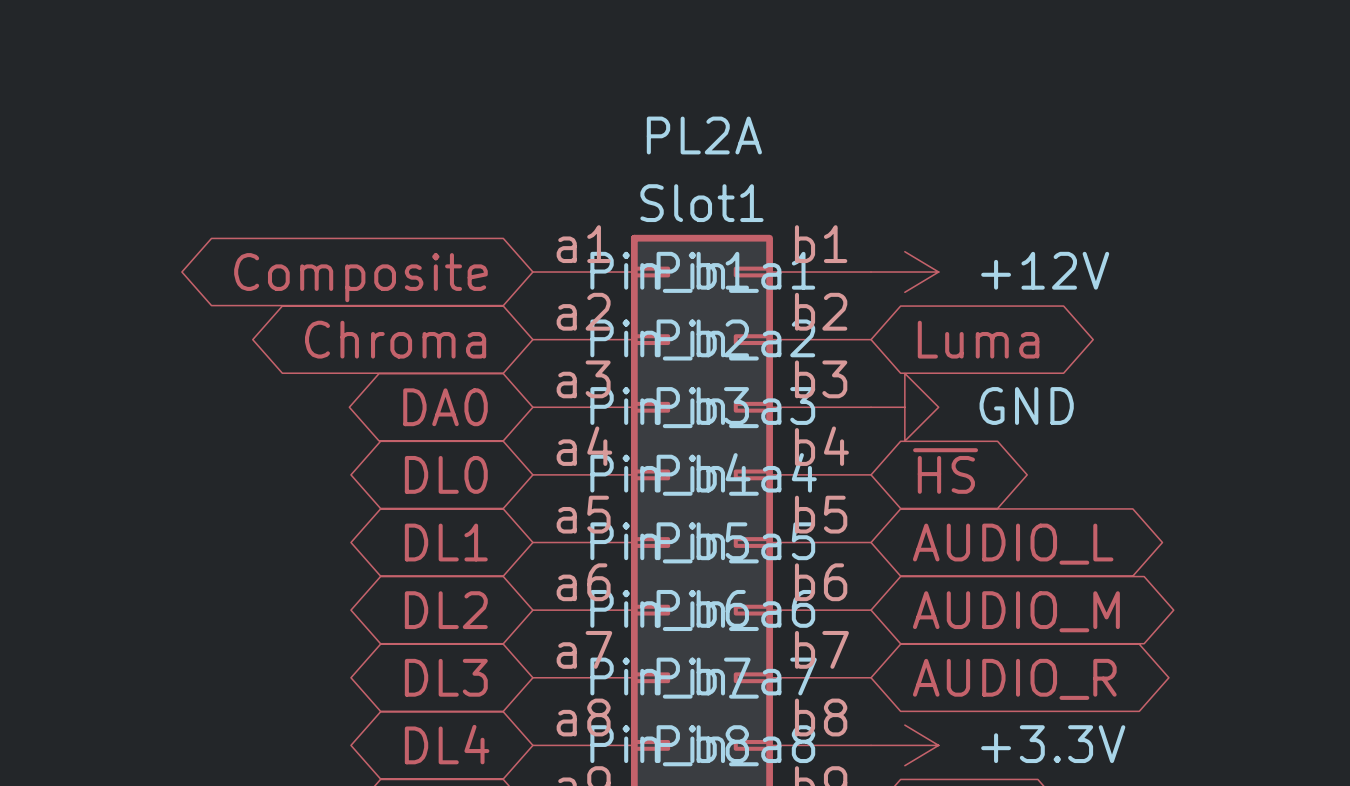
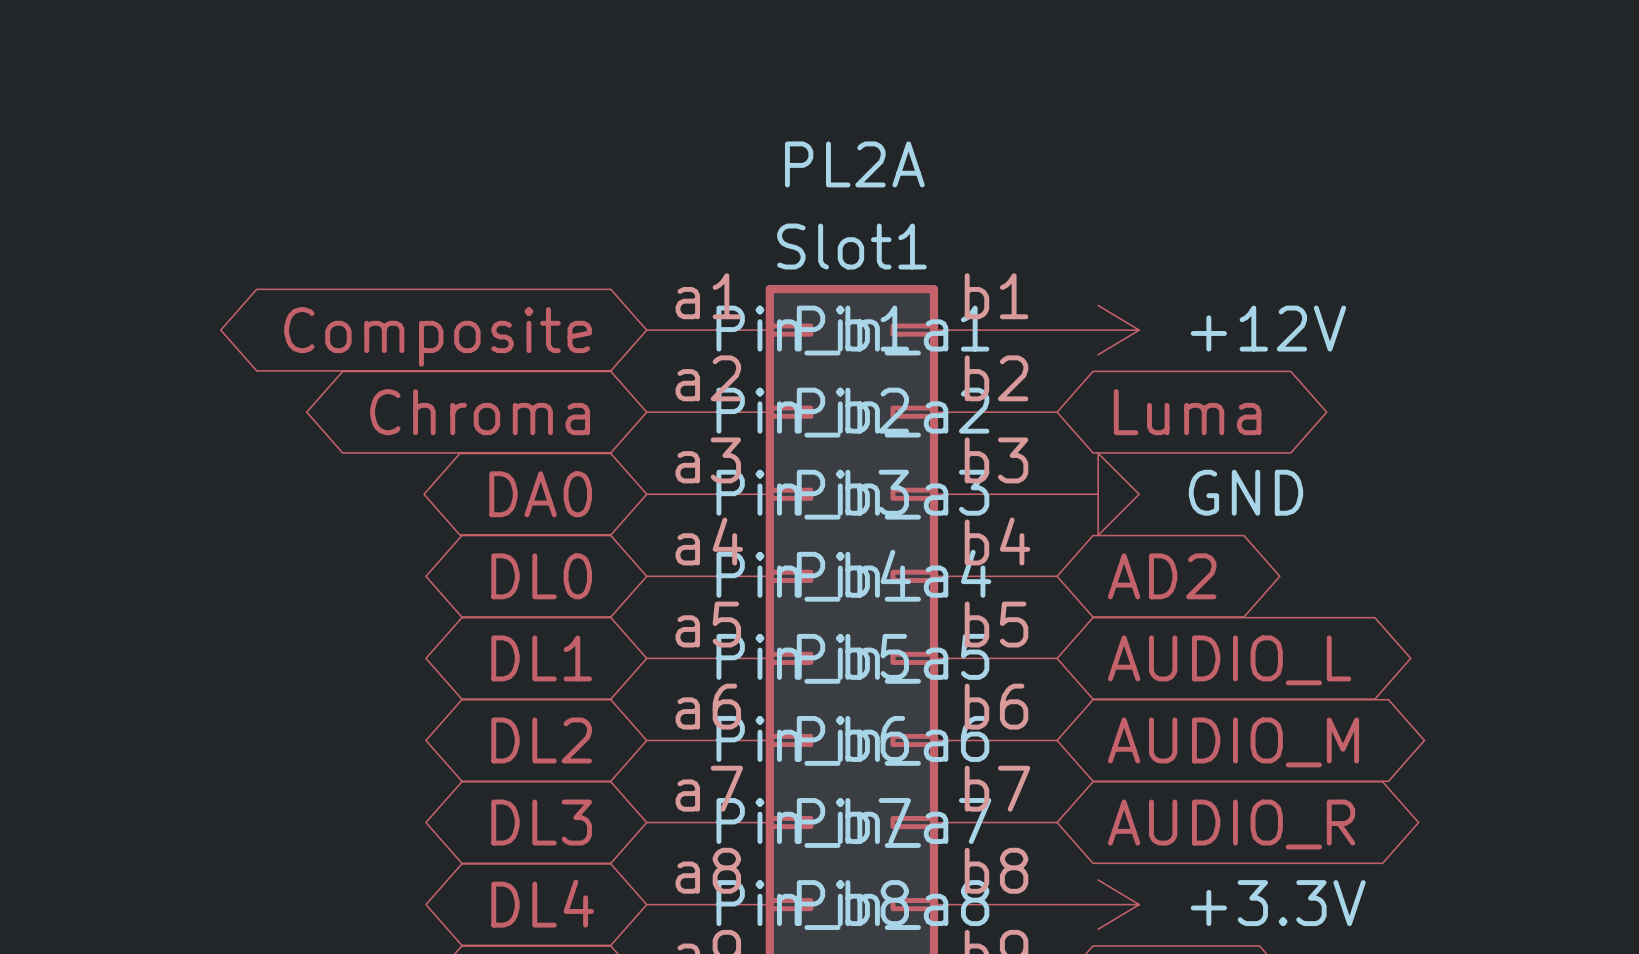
global label: ~{HS} (945, 471) -> AD2 (1162, 576)

